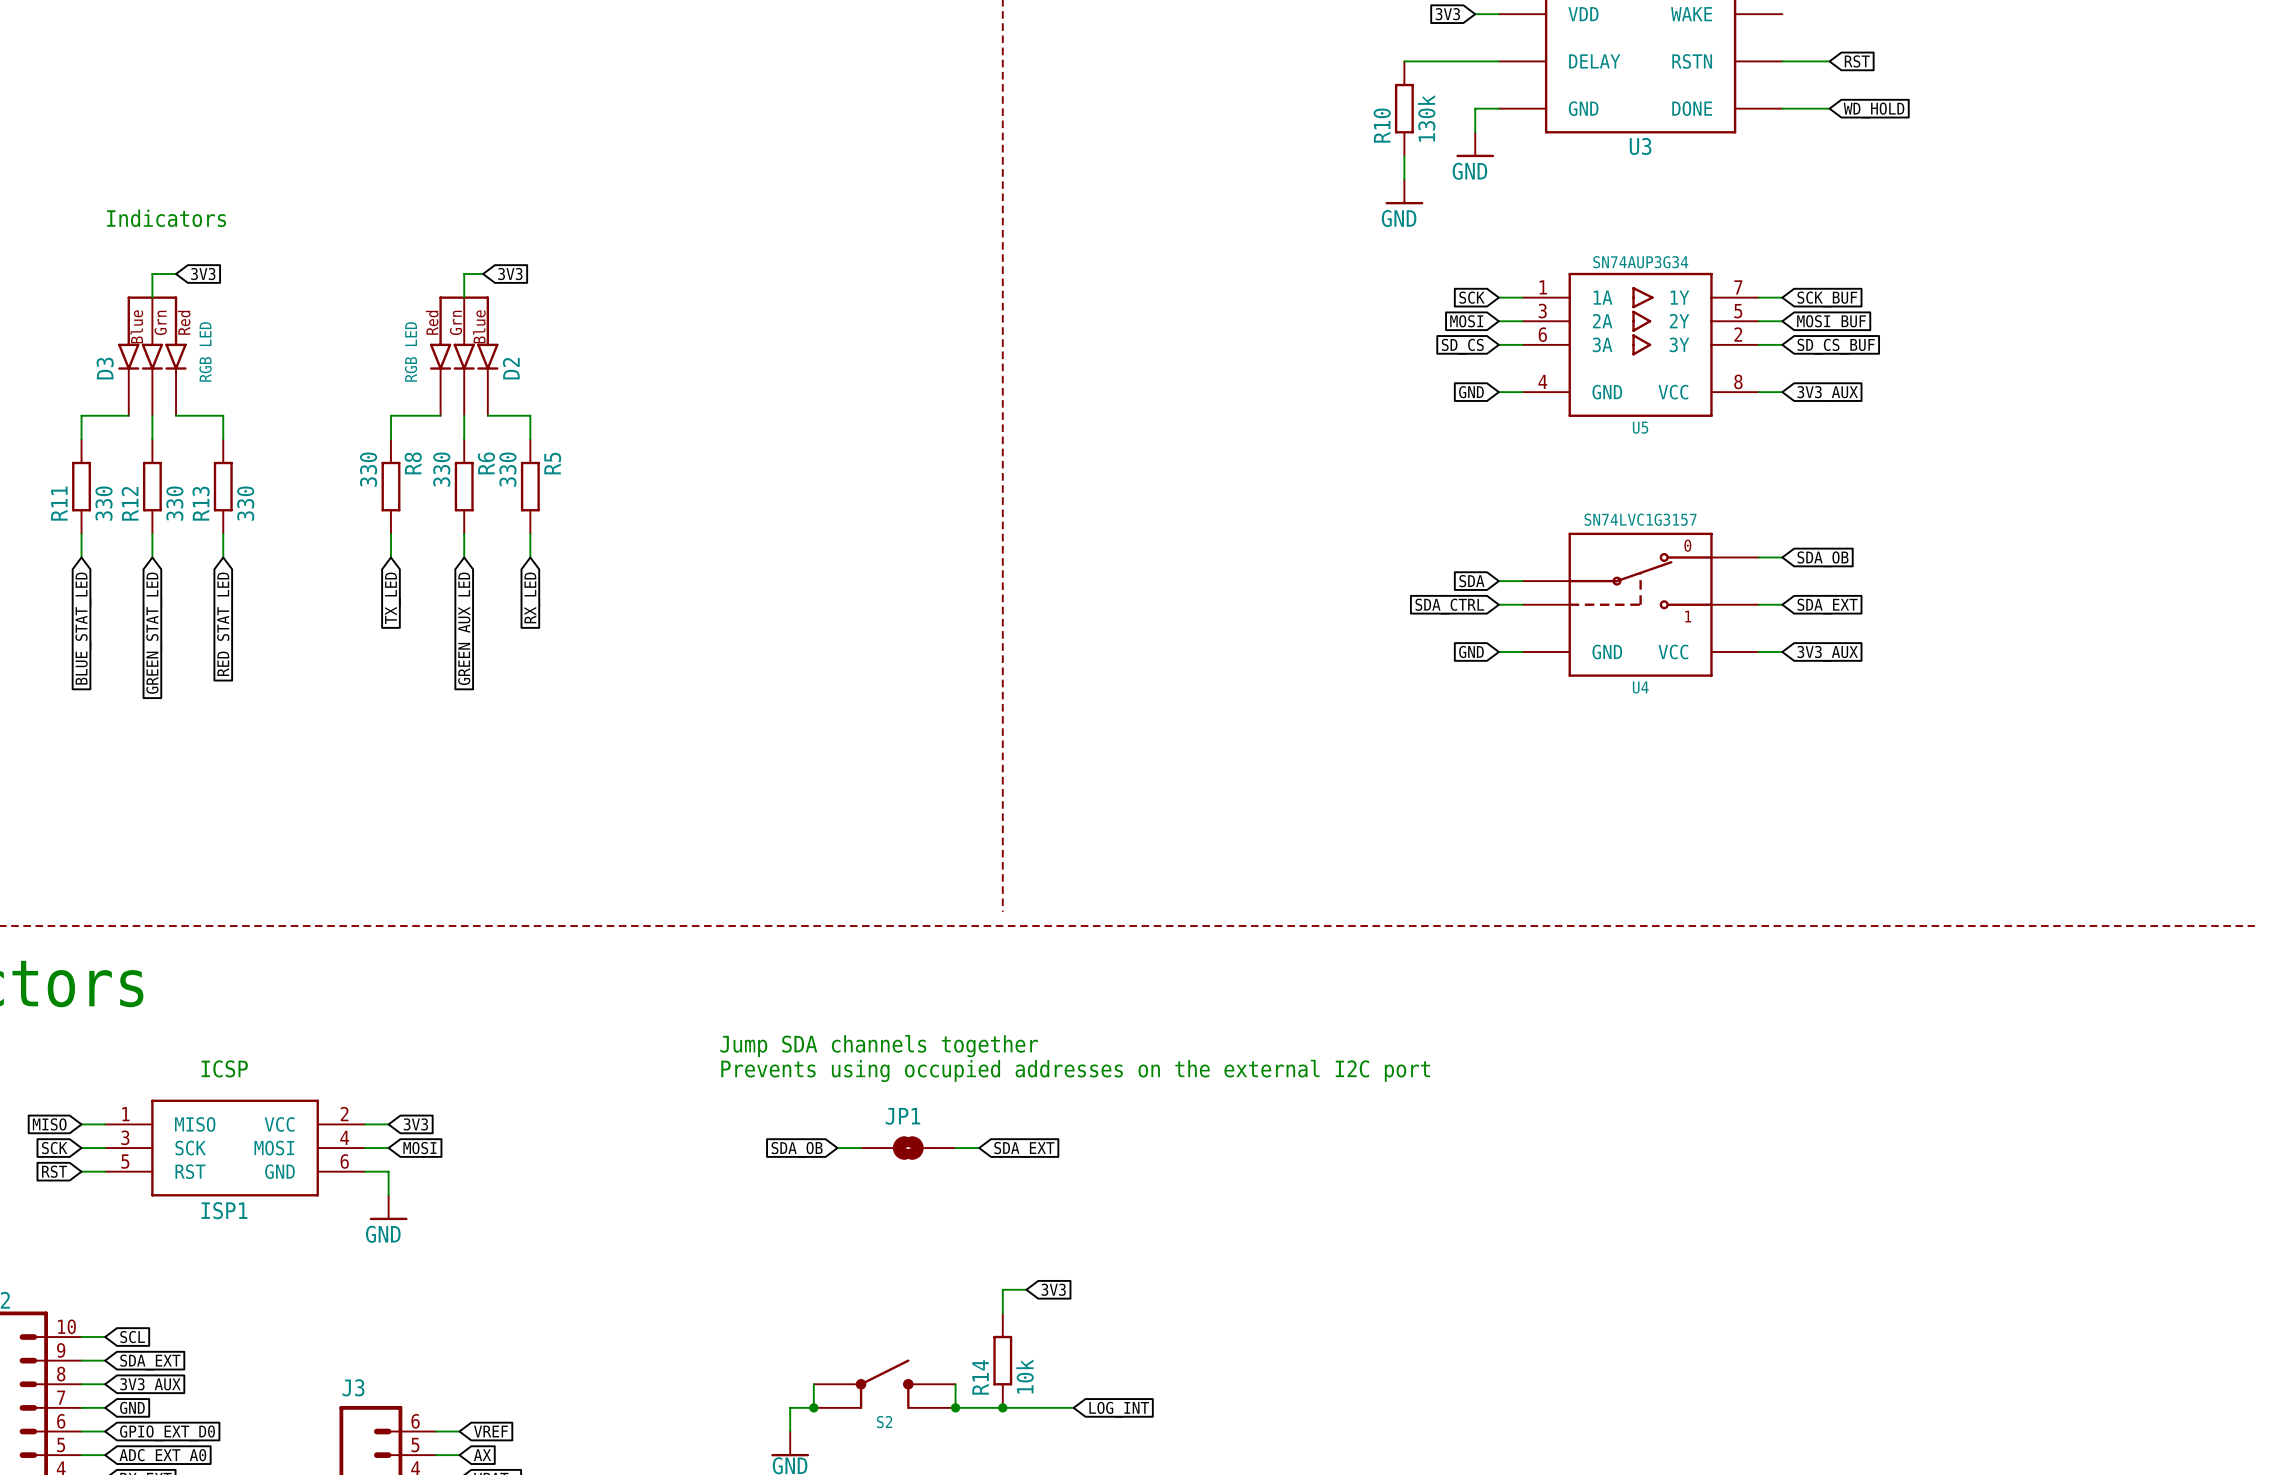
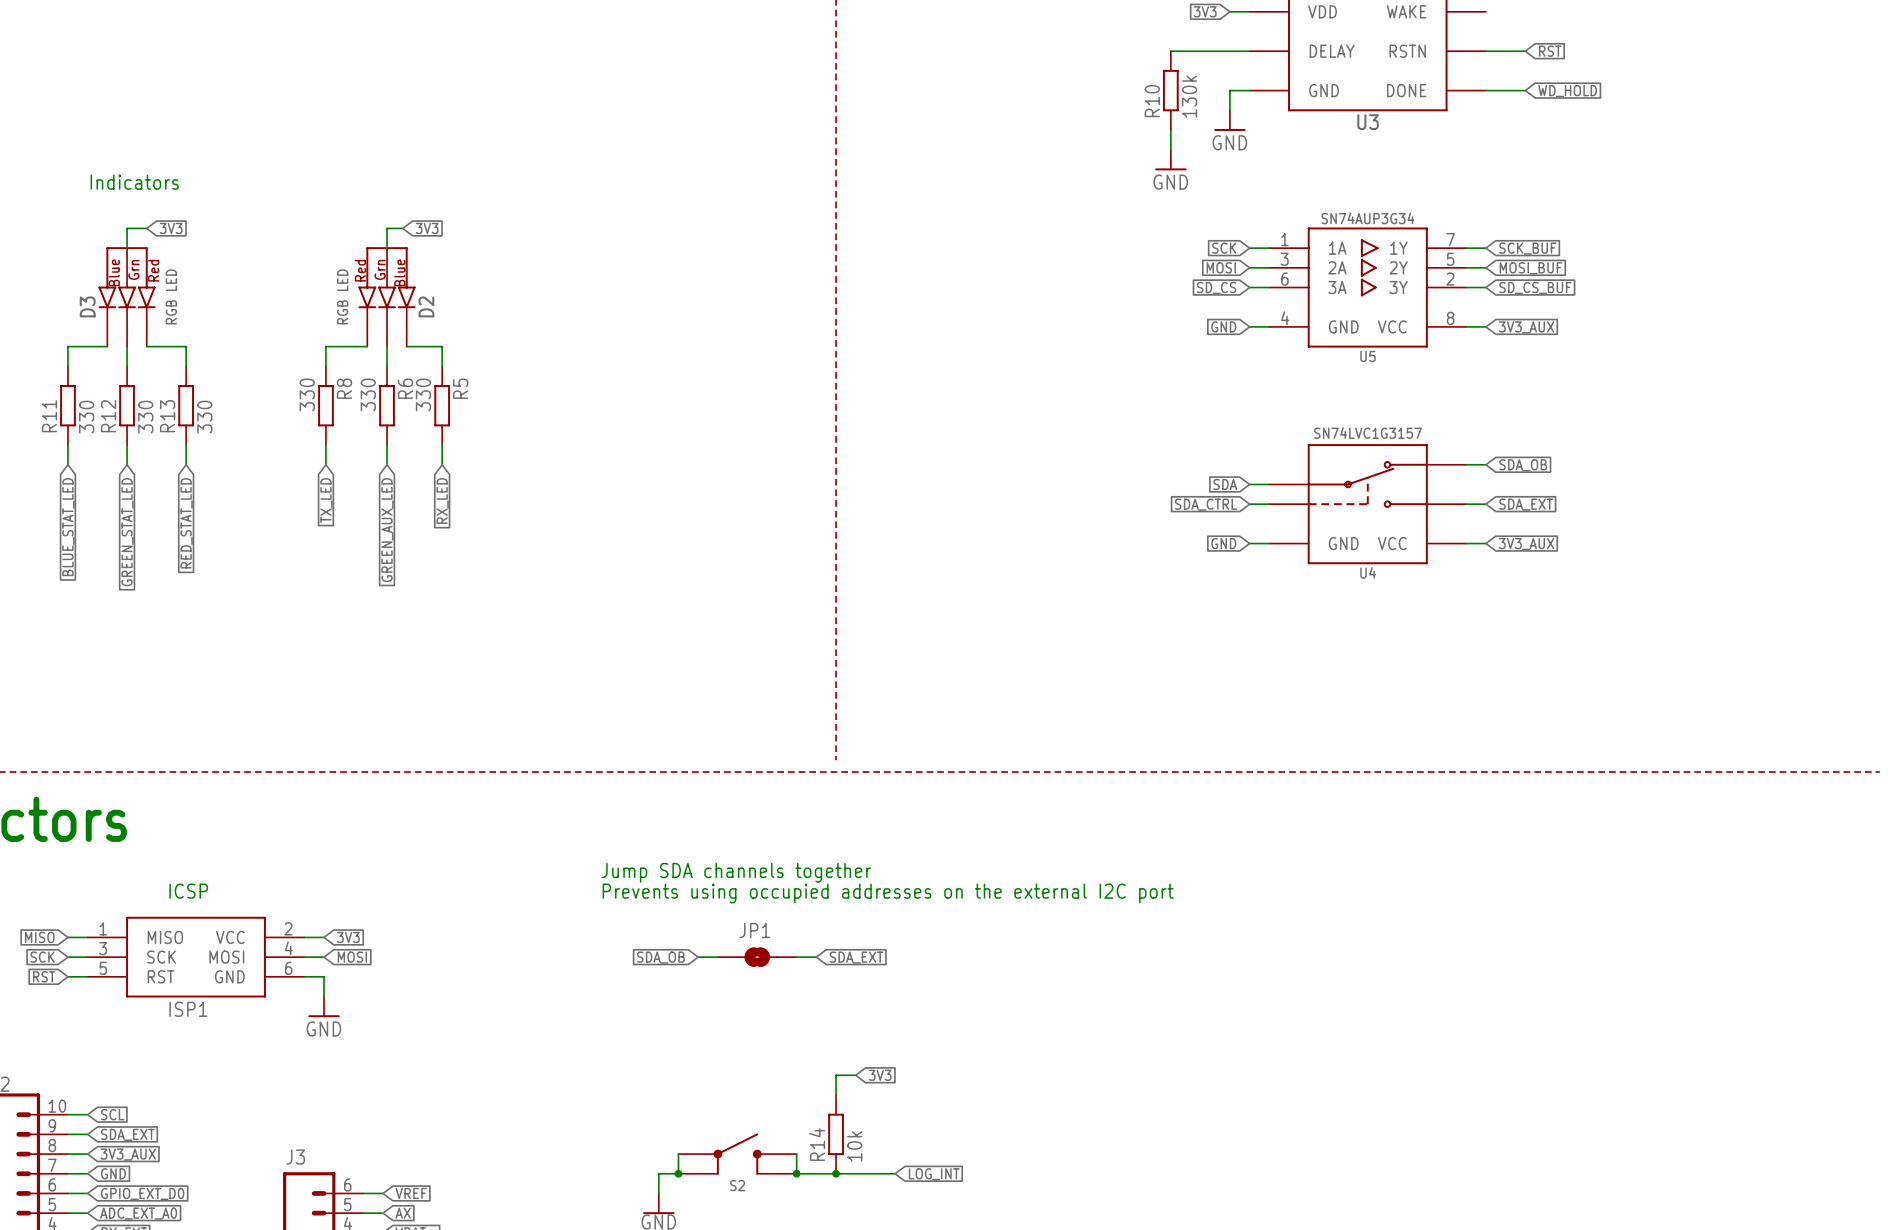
U4 text: 0 (1687, 545) -> none
U4 text: 1 (1688, 616) -> none

